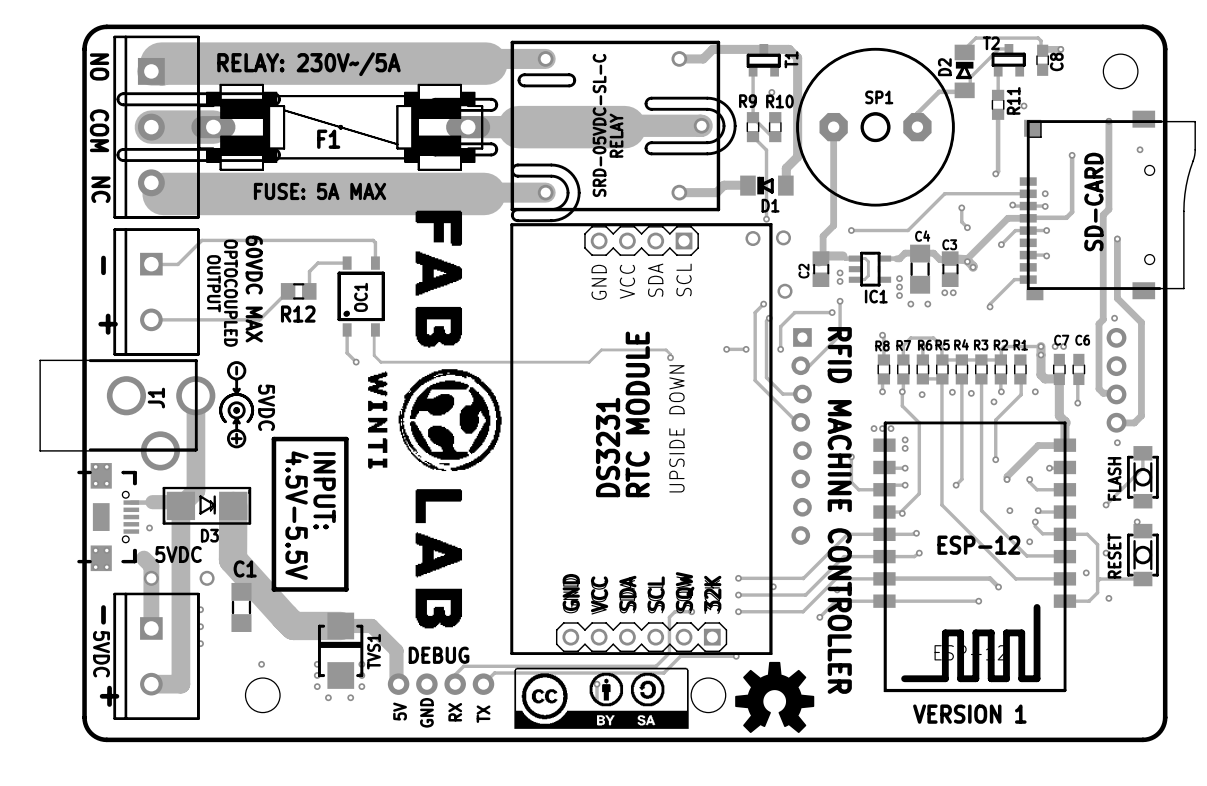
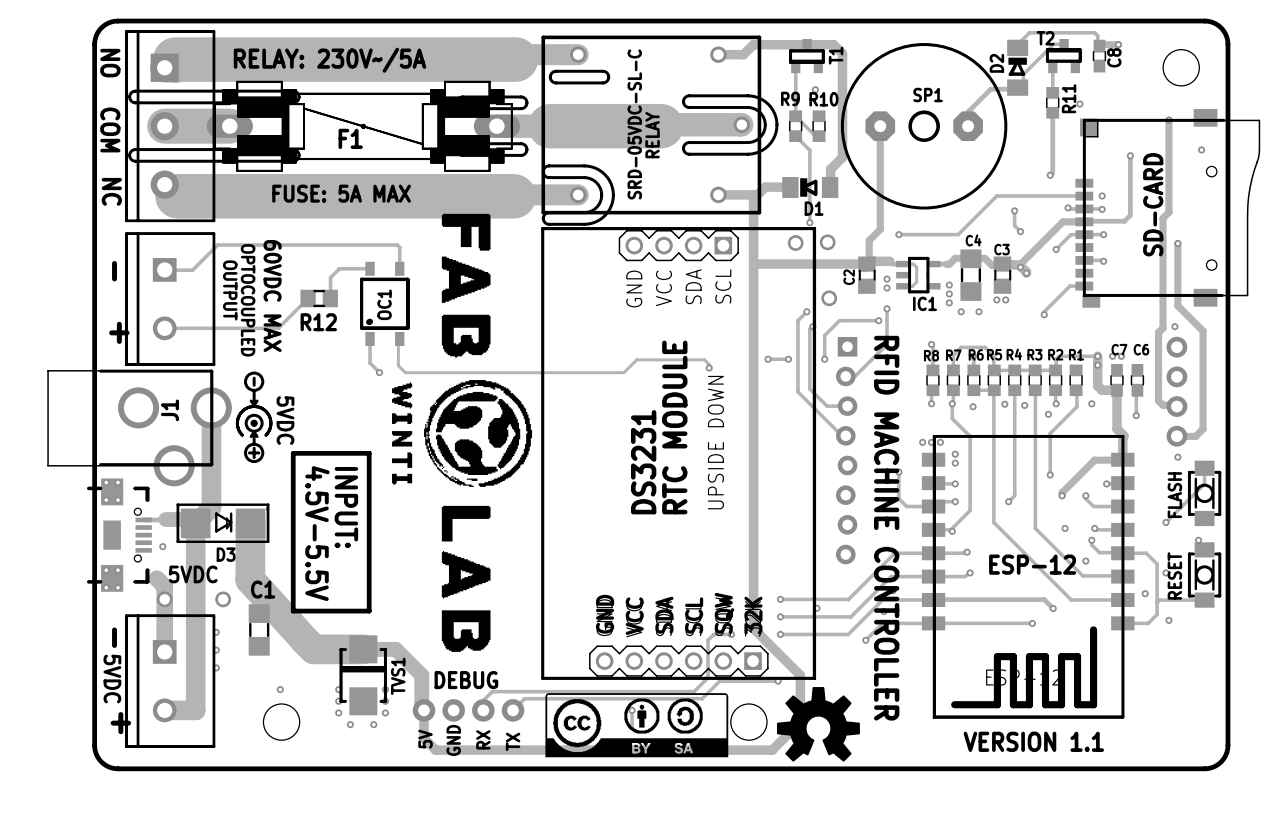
track: none -> (753, 194) (753, 628) (800, 675) (800, 722) (772, 750) (435, 750) (423, 738) (423, 710)
track: none -> (753, 264) (866, 264)
text: VERSION 1 (969, 714) -> VERSION 1.1 (1033, 741)

